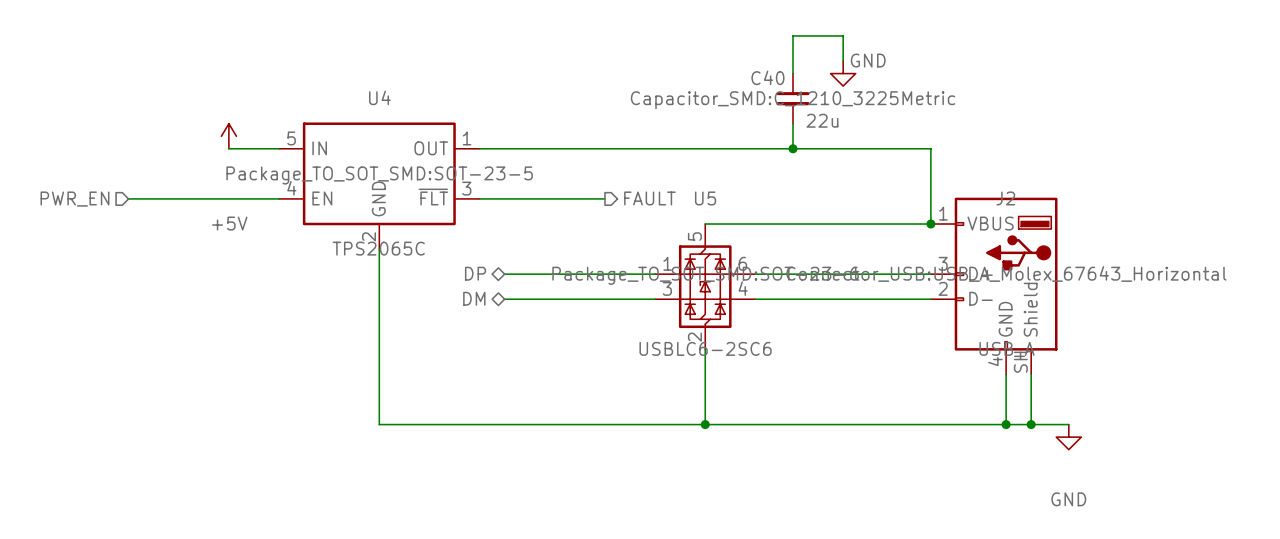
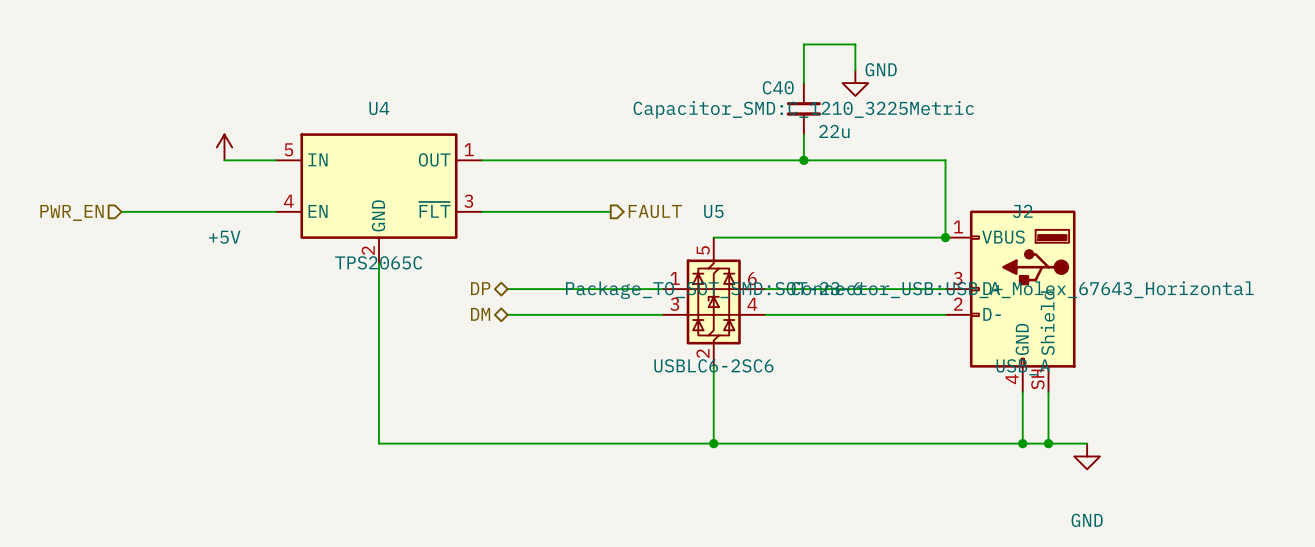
U4 text: Package_TO_SOT_SMD:SOT-23-5 (379, 175) -> none

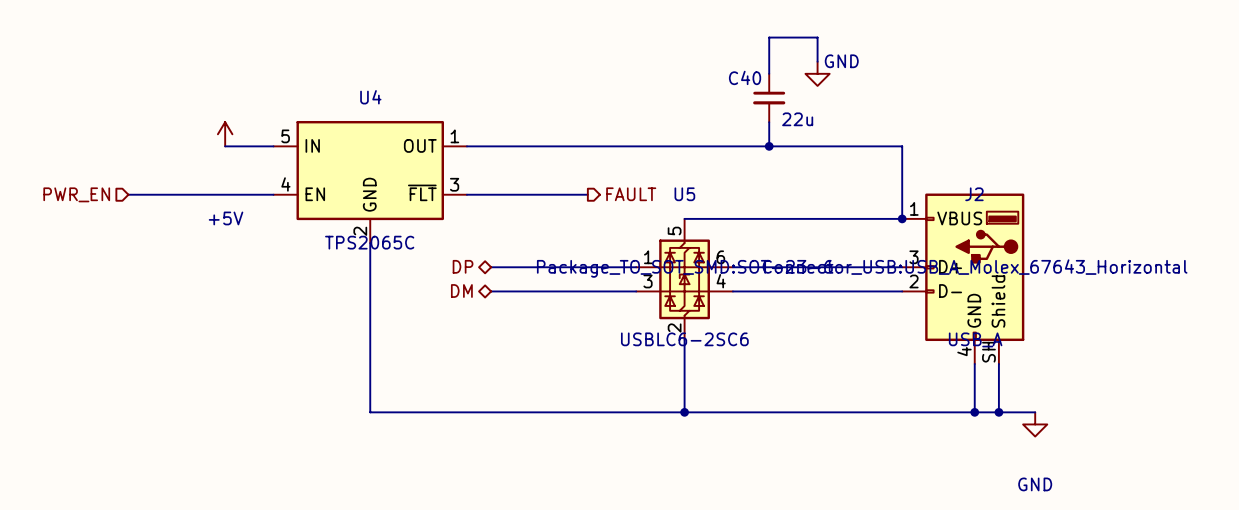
C40 text: Capacitor_SMD:C_1210_3225Metric (803, 109) -> none

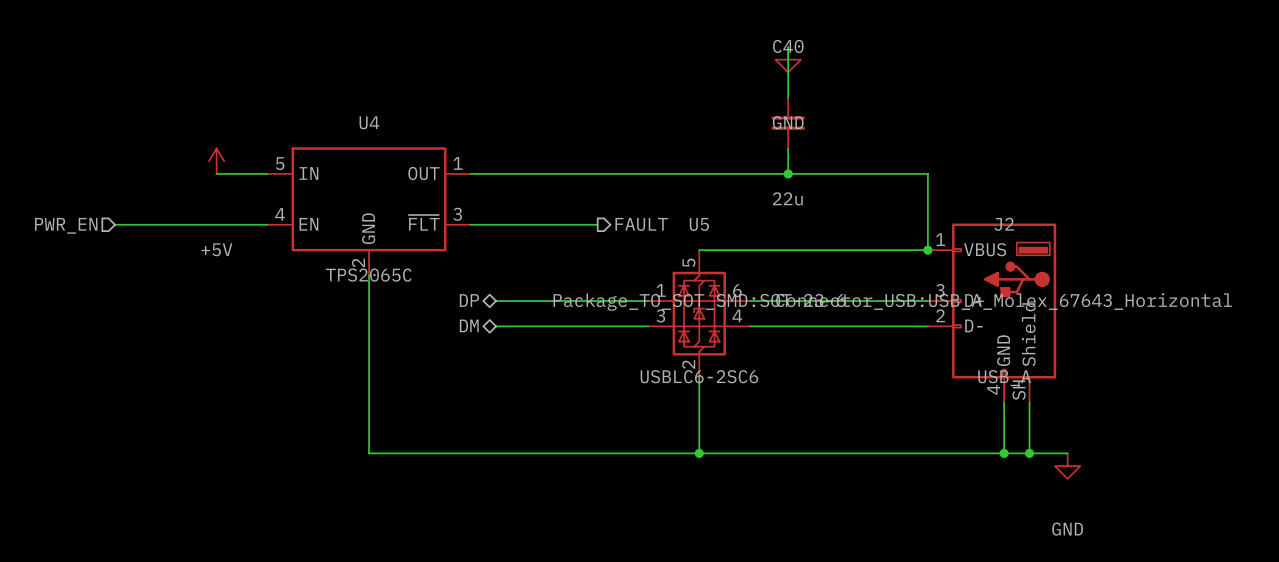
wire: (769, 37) (817, 37) (817, 61) -> (788, 59) (788, 46)
power symbol text position: GND (841, 61) -> GND (788, 122)
power symbol position: GND (817, 73) -> GND (788, 59)
C40 name position: C40 (745, 77) -> C40 (788, 46)
C40 value position: 22u (797, 119) -> 22u (787, 198)

